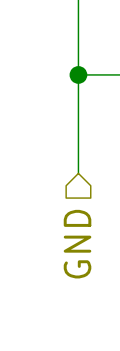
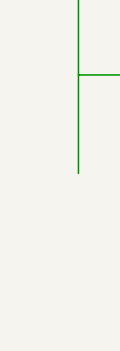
junction: (78, 74) -> none
hierarchical label: GND (77, 244) -> none

